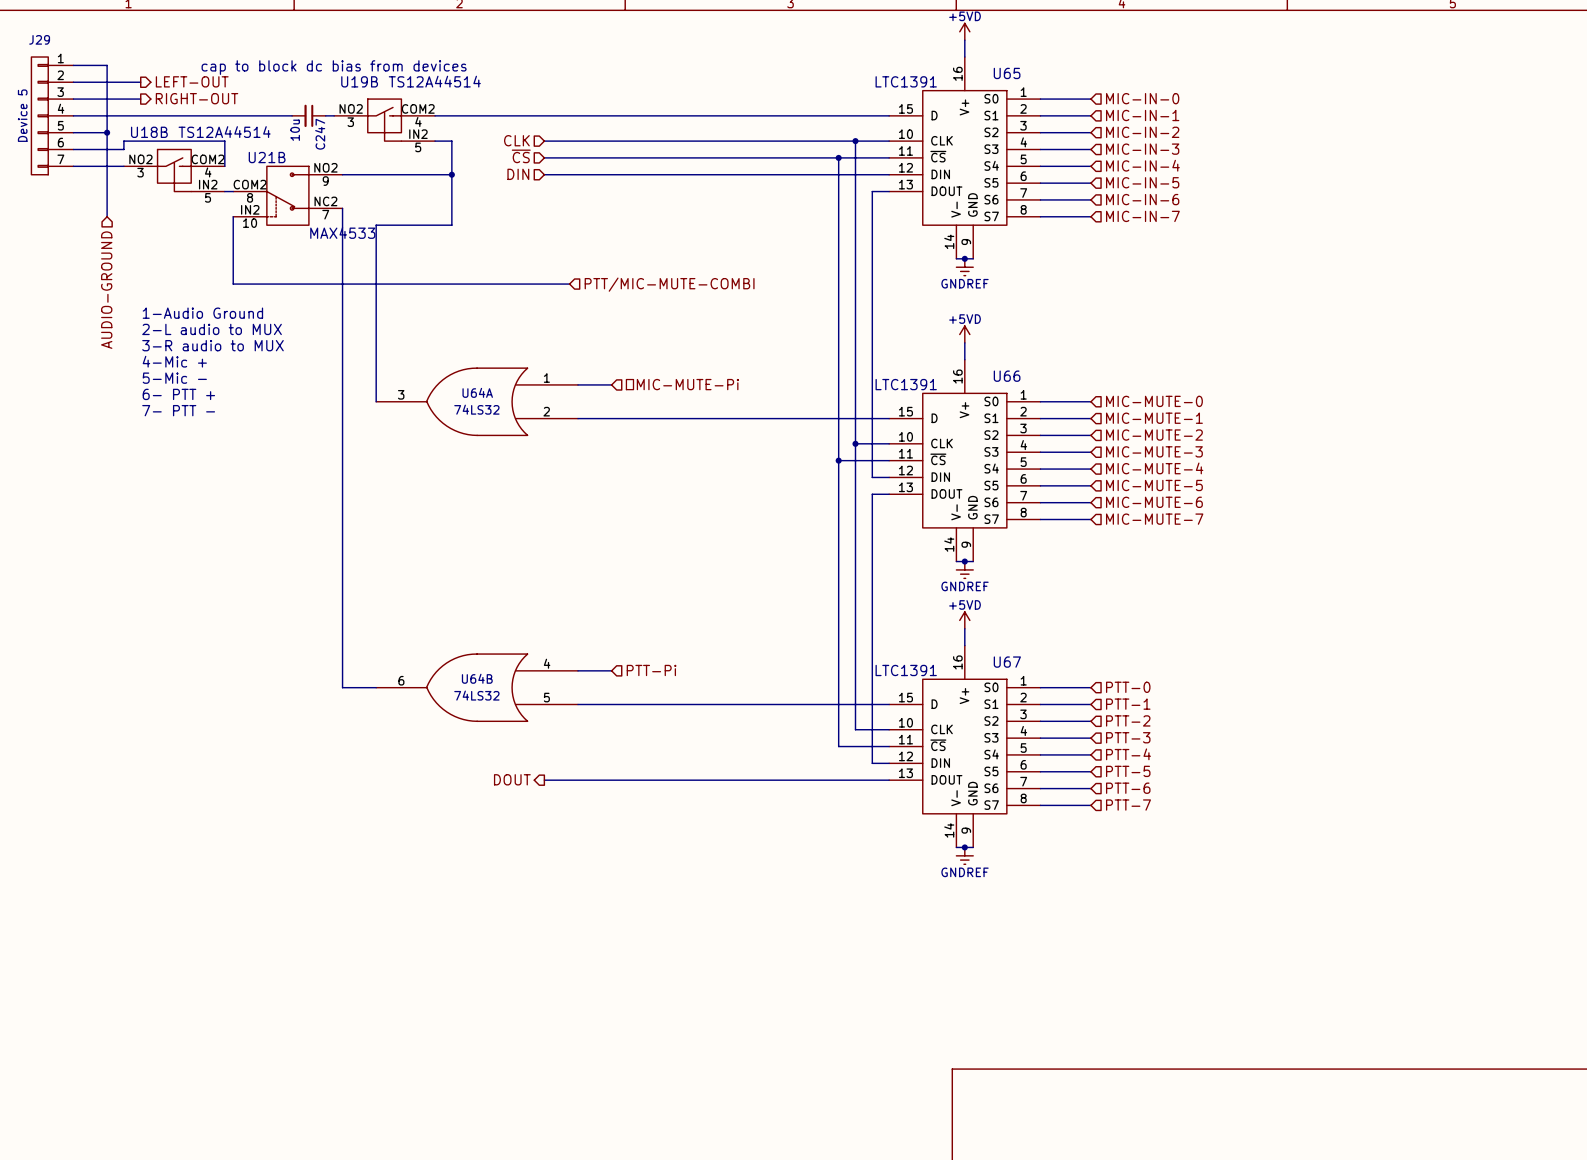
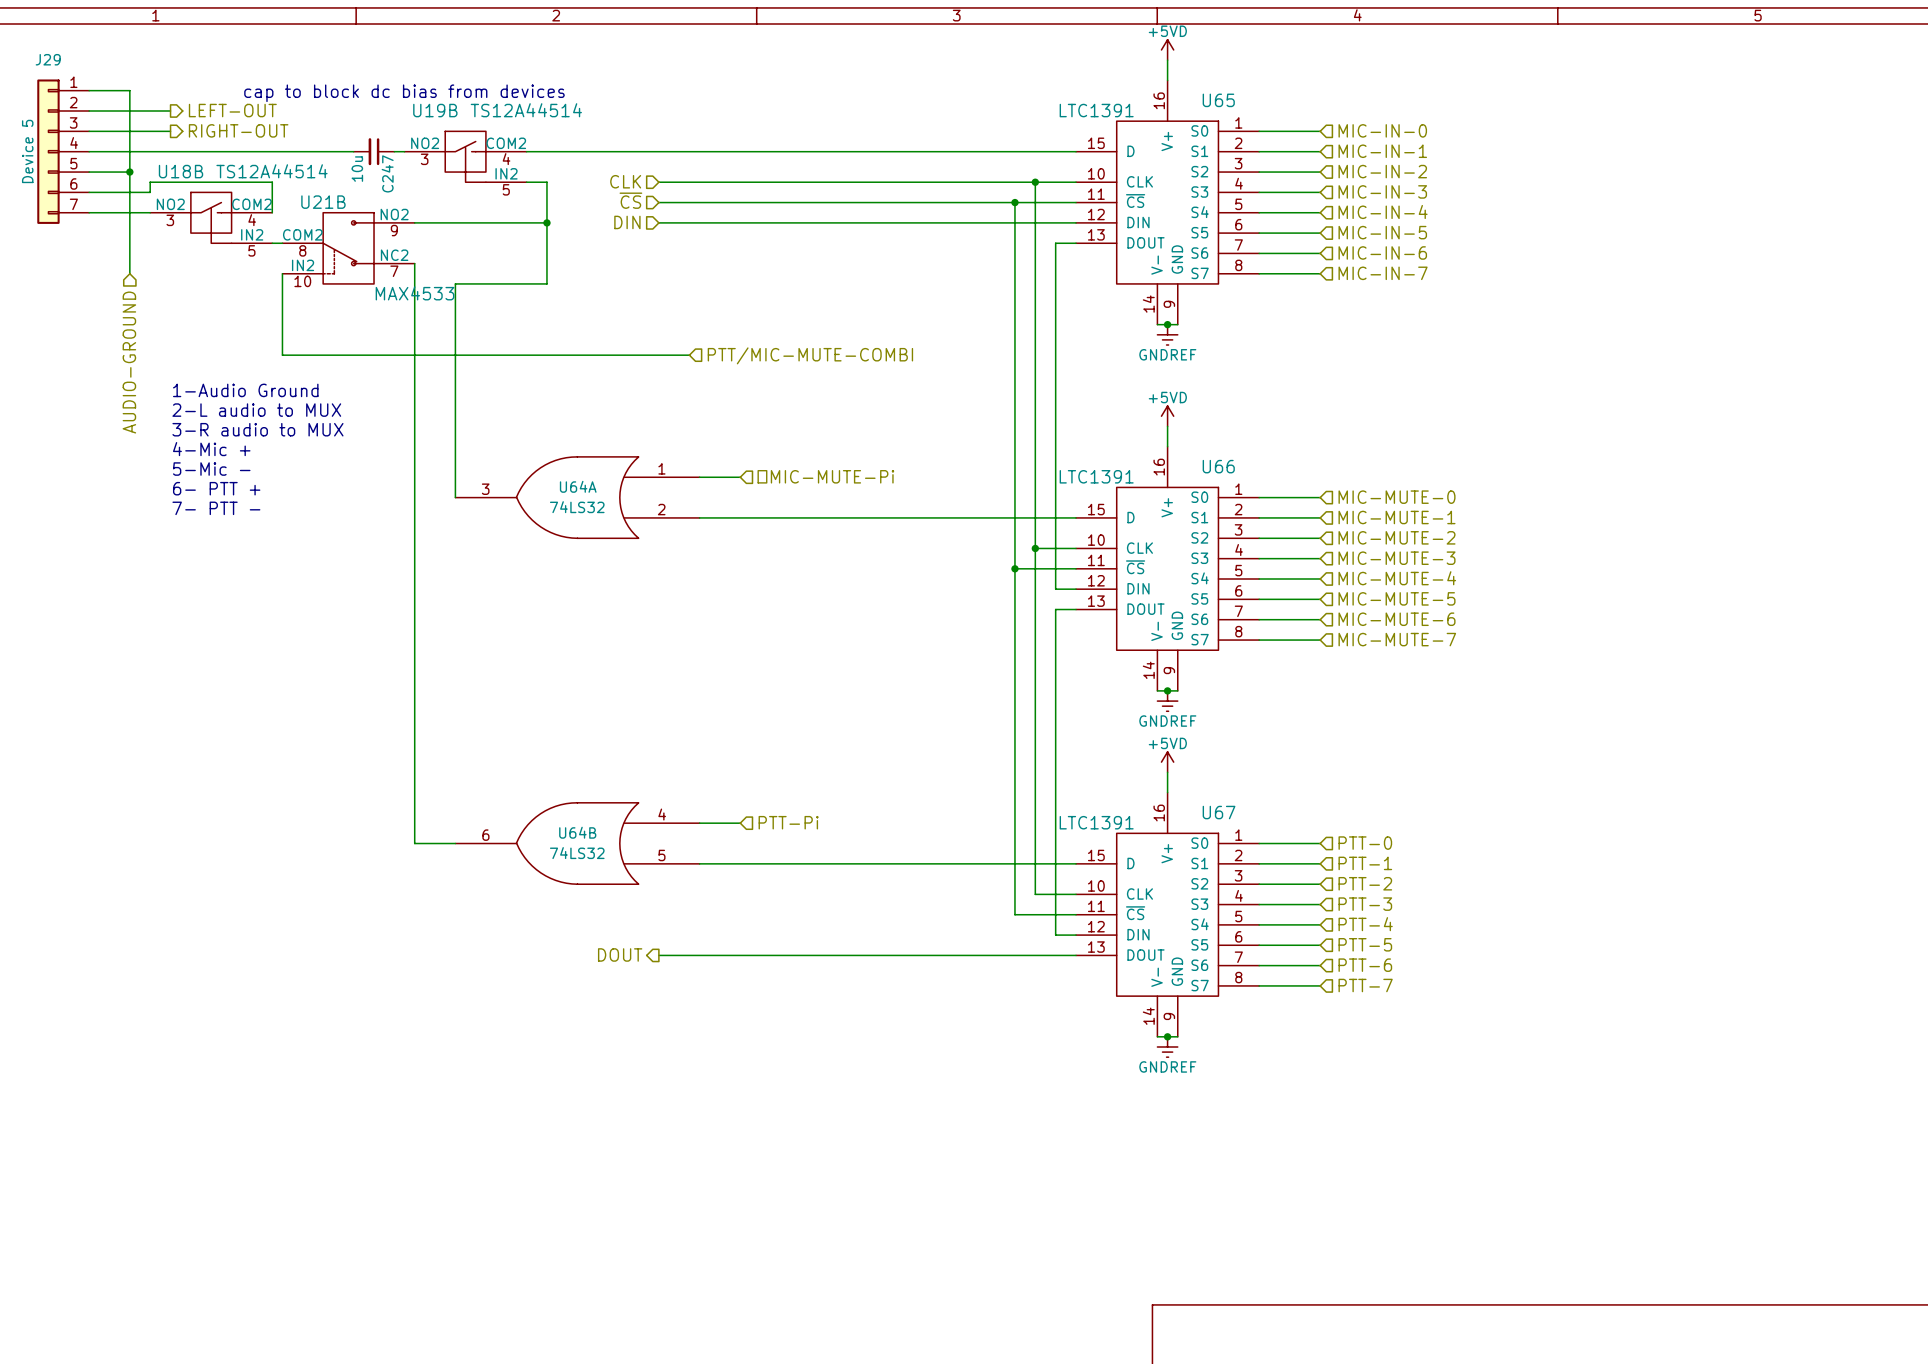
J29 symbol: [31, 57, 74, 175] -> [37, 79, 90, 224]

